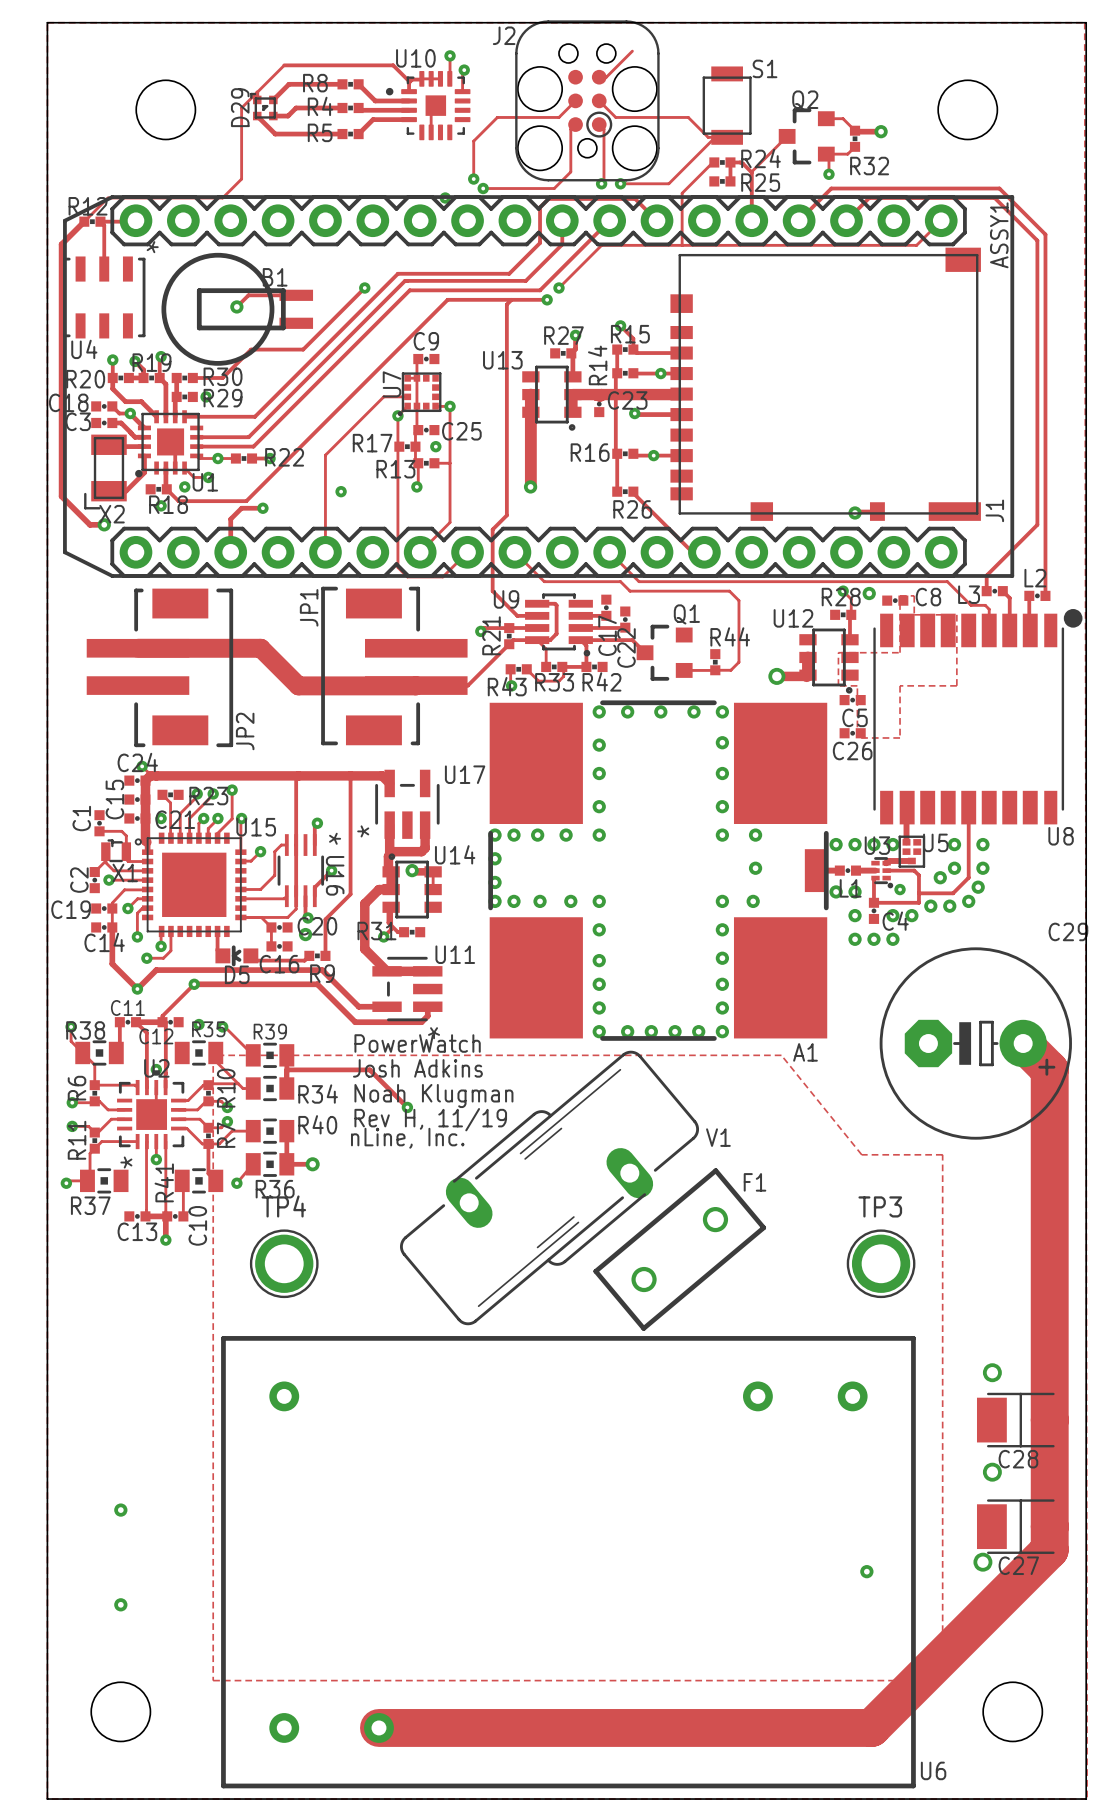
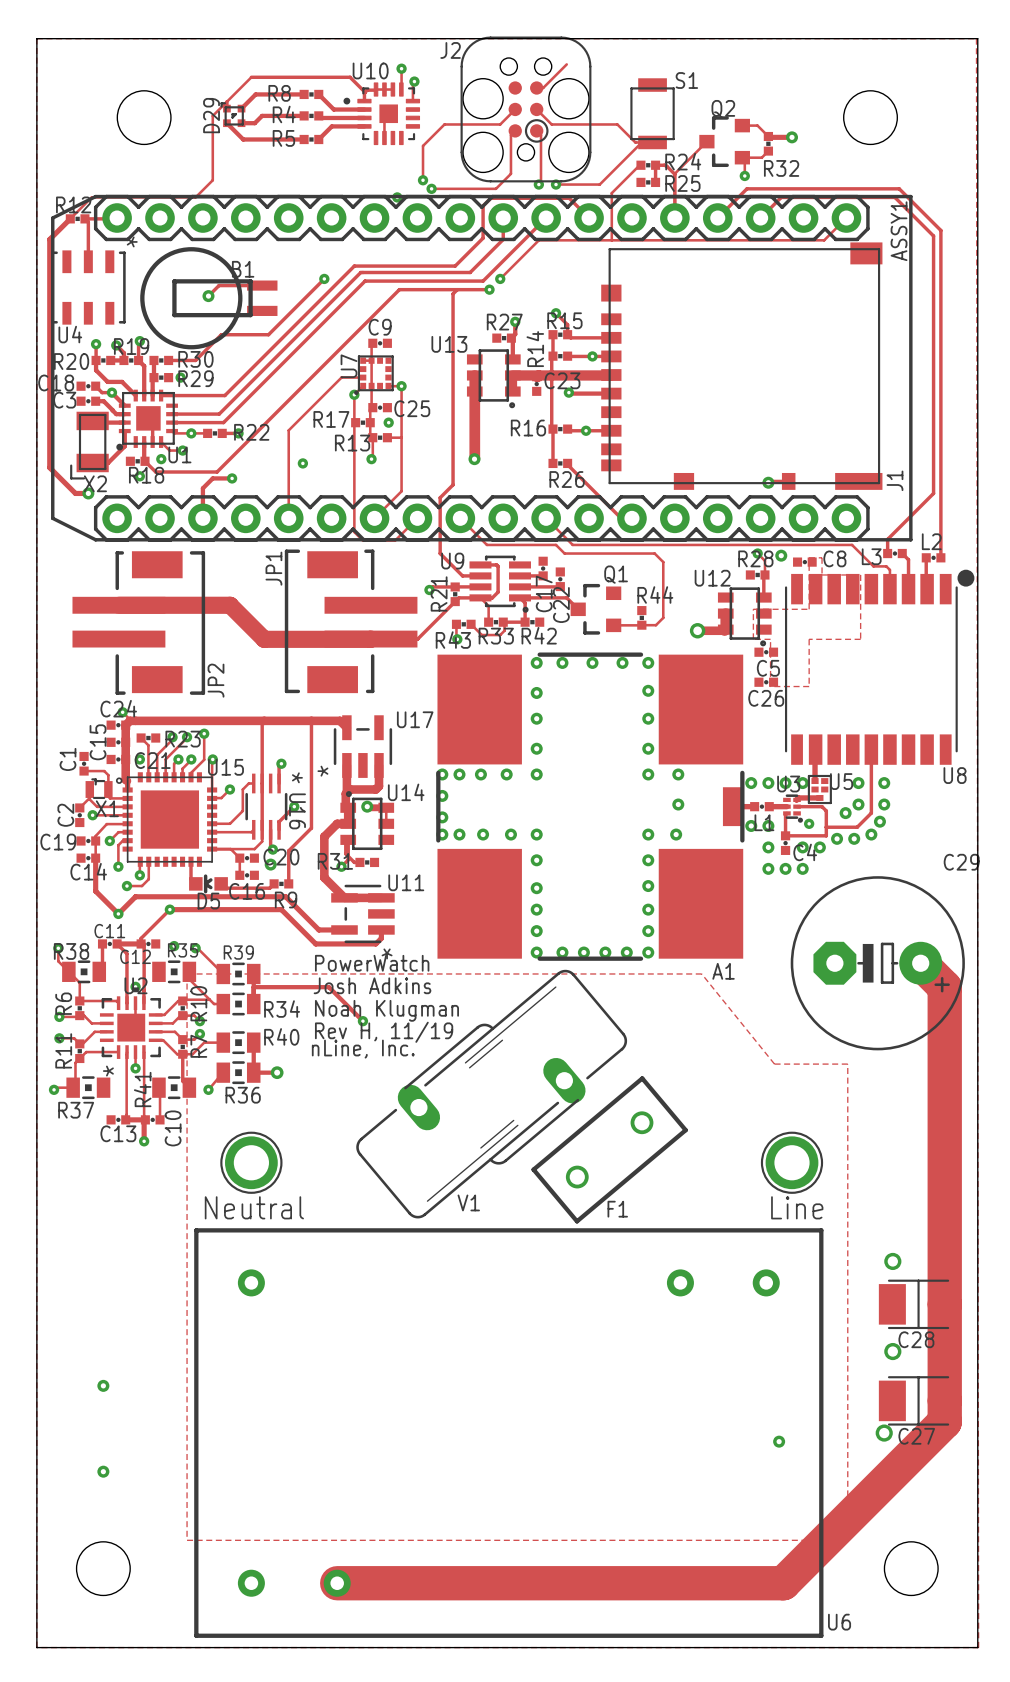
V1 name position: V1 (718, 1137) -> V1 (468, 1202)
F1 name position: F1 (755, 1182) -> F1 (617, 1209)
TP4 name: TP4 (283, 1206) -> none
TP3 name: TP3 (880, 1206) -> none
text: none -> Neutral (254, 1207)
text: none -> Line (797, 1207)

